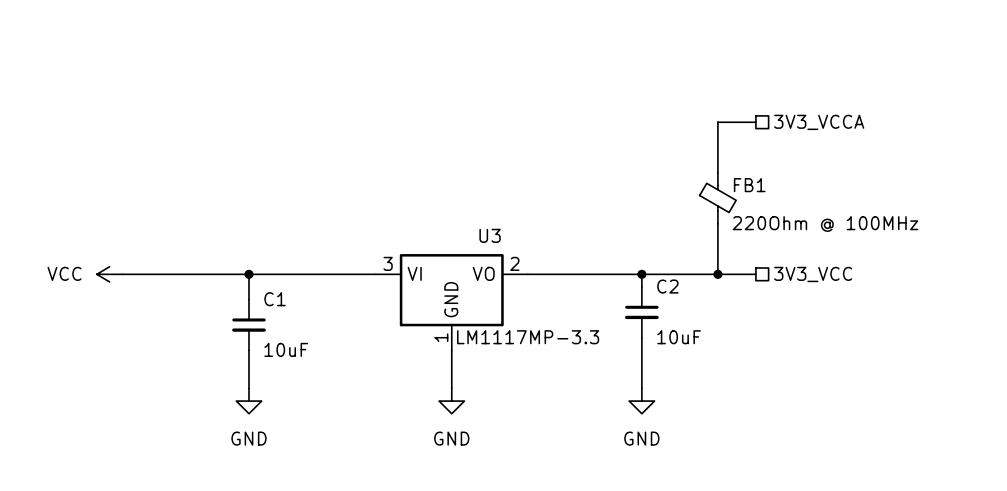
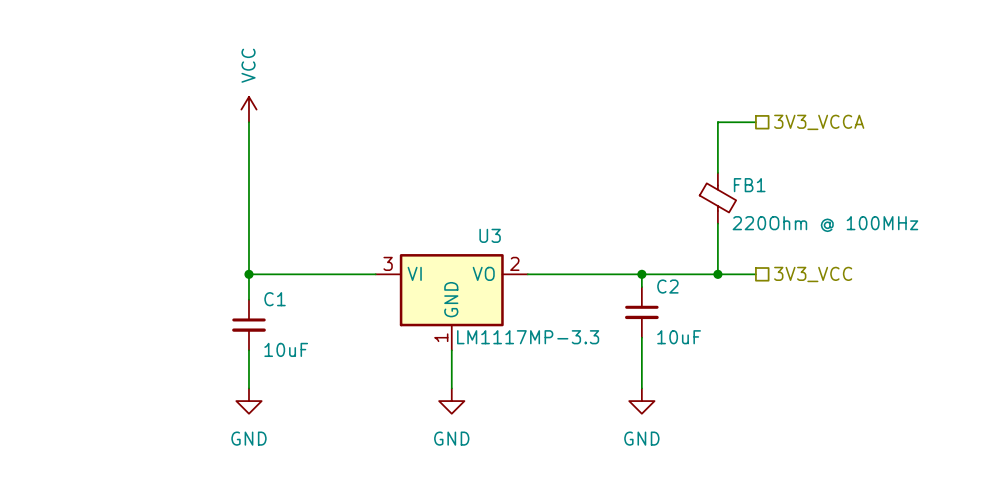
power symbol rotation: 0° (109, 274) -> 90° clockwise (248, 109)
power symbol position: VCC (109, 274) -> VCC (248, 109)
wire: (122, 274) (248, 274) -> (248, 122) (248, 274)

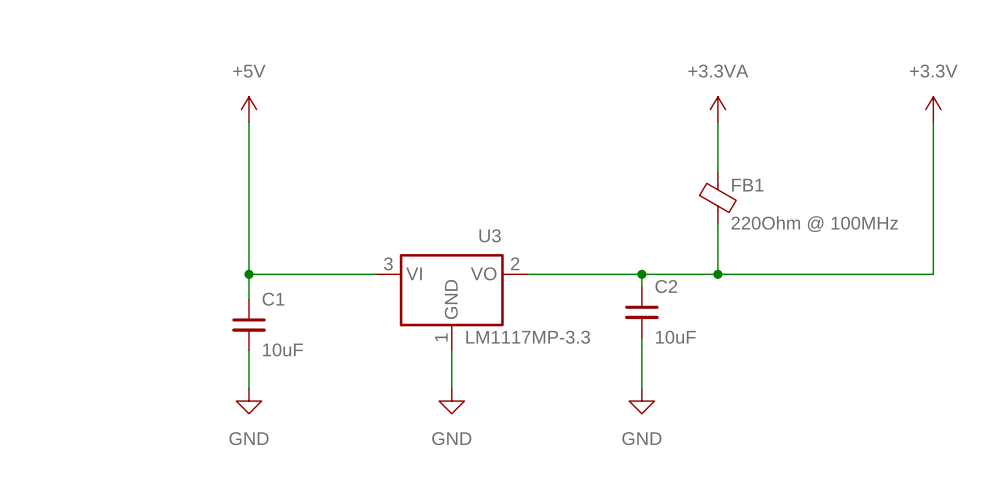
power symbol: VCC (248, 109) -> +5V (248, 109)
power symbol: none -> +3.3VA (717, 109)
power symbol: none -> +3.3V (933, 109)
wire: (717, 122) (755, 122) -> none
hierarchical label: 3V3_VCCA (819, 122) -> none
wire: none -> (933, 122) (933, 274) (755, 274)
hierarchical label: 3V3_VCC (813, 274) -> none

